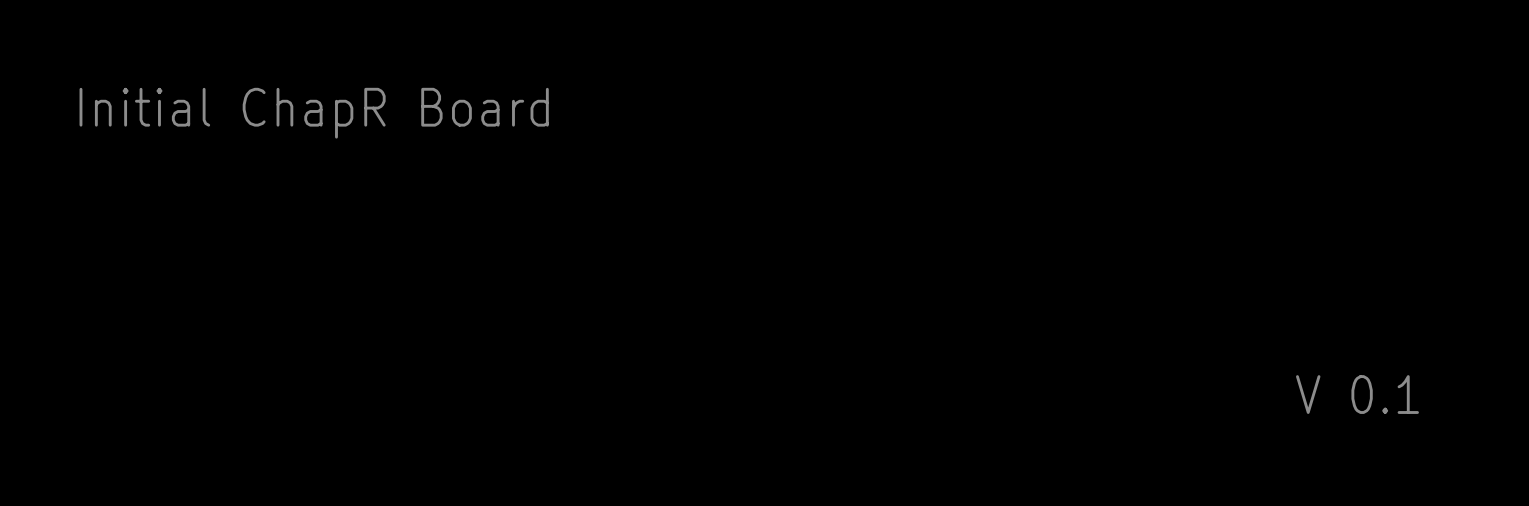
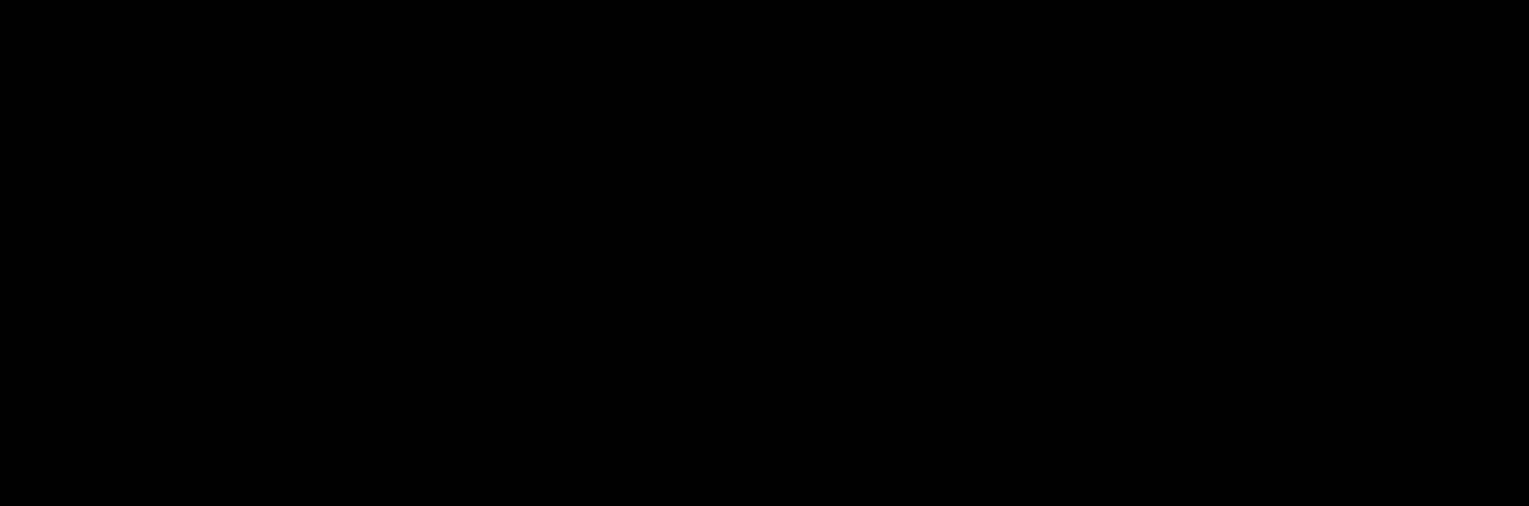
text: Initial ChapR Board (314, 113) -> none
text: V 0.1 (1357, 394) -> none

